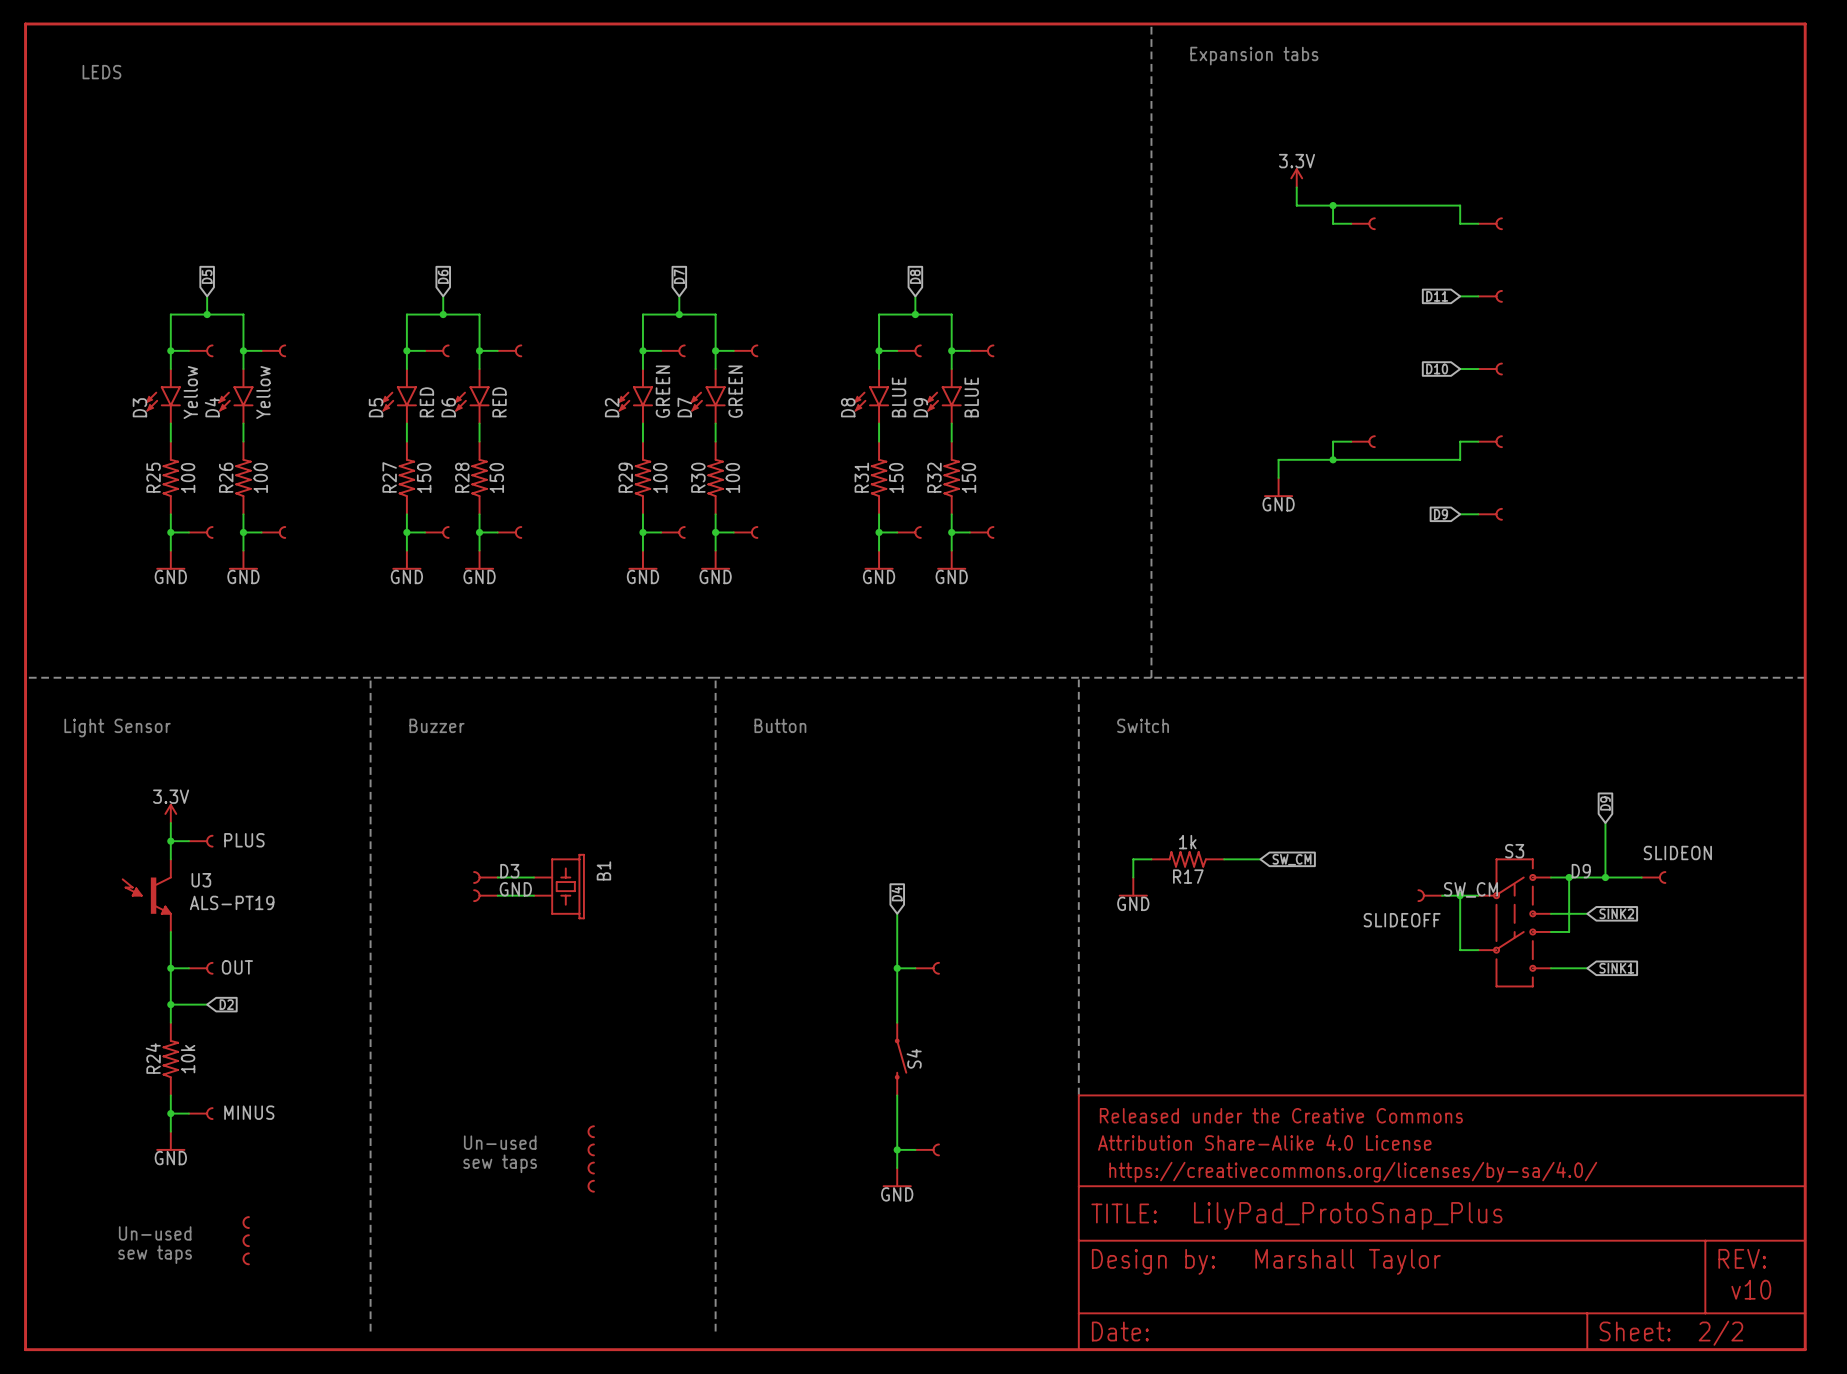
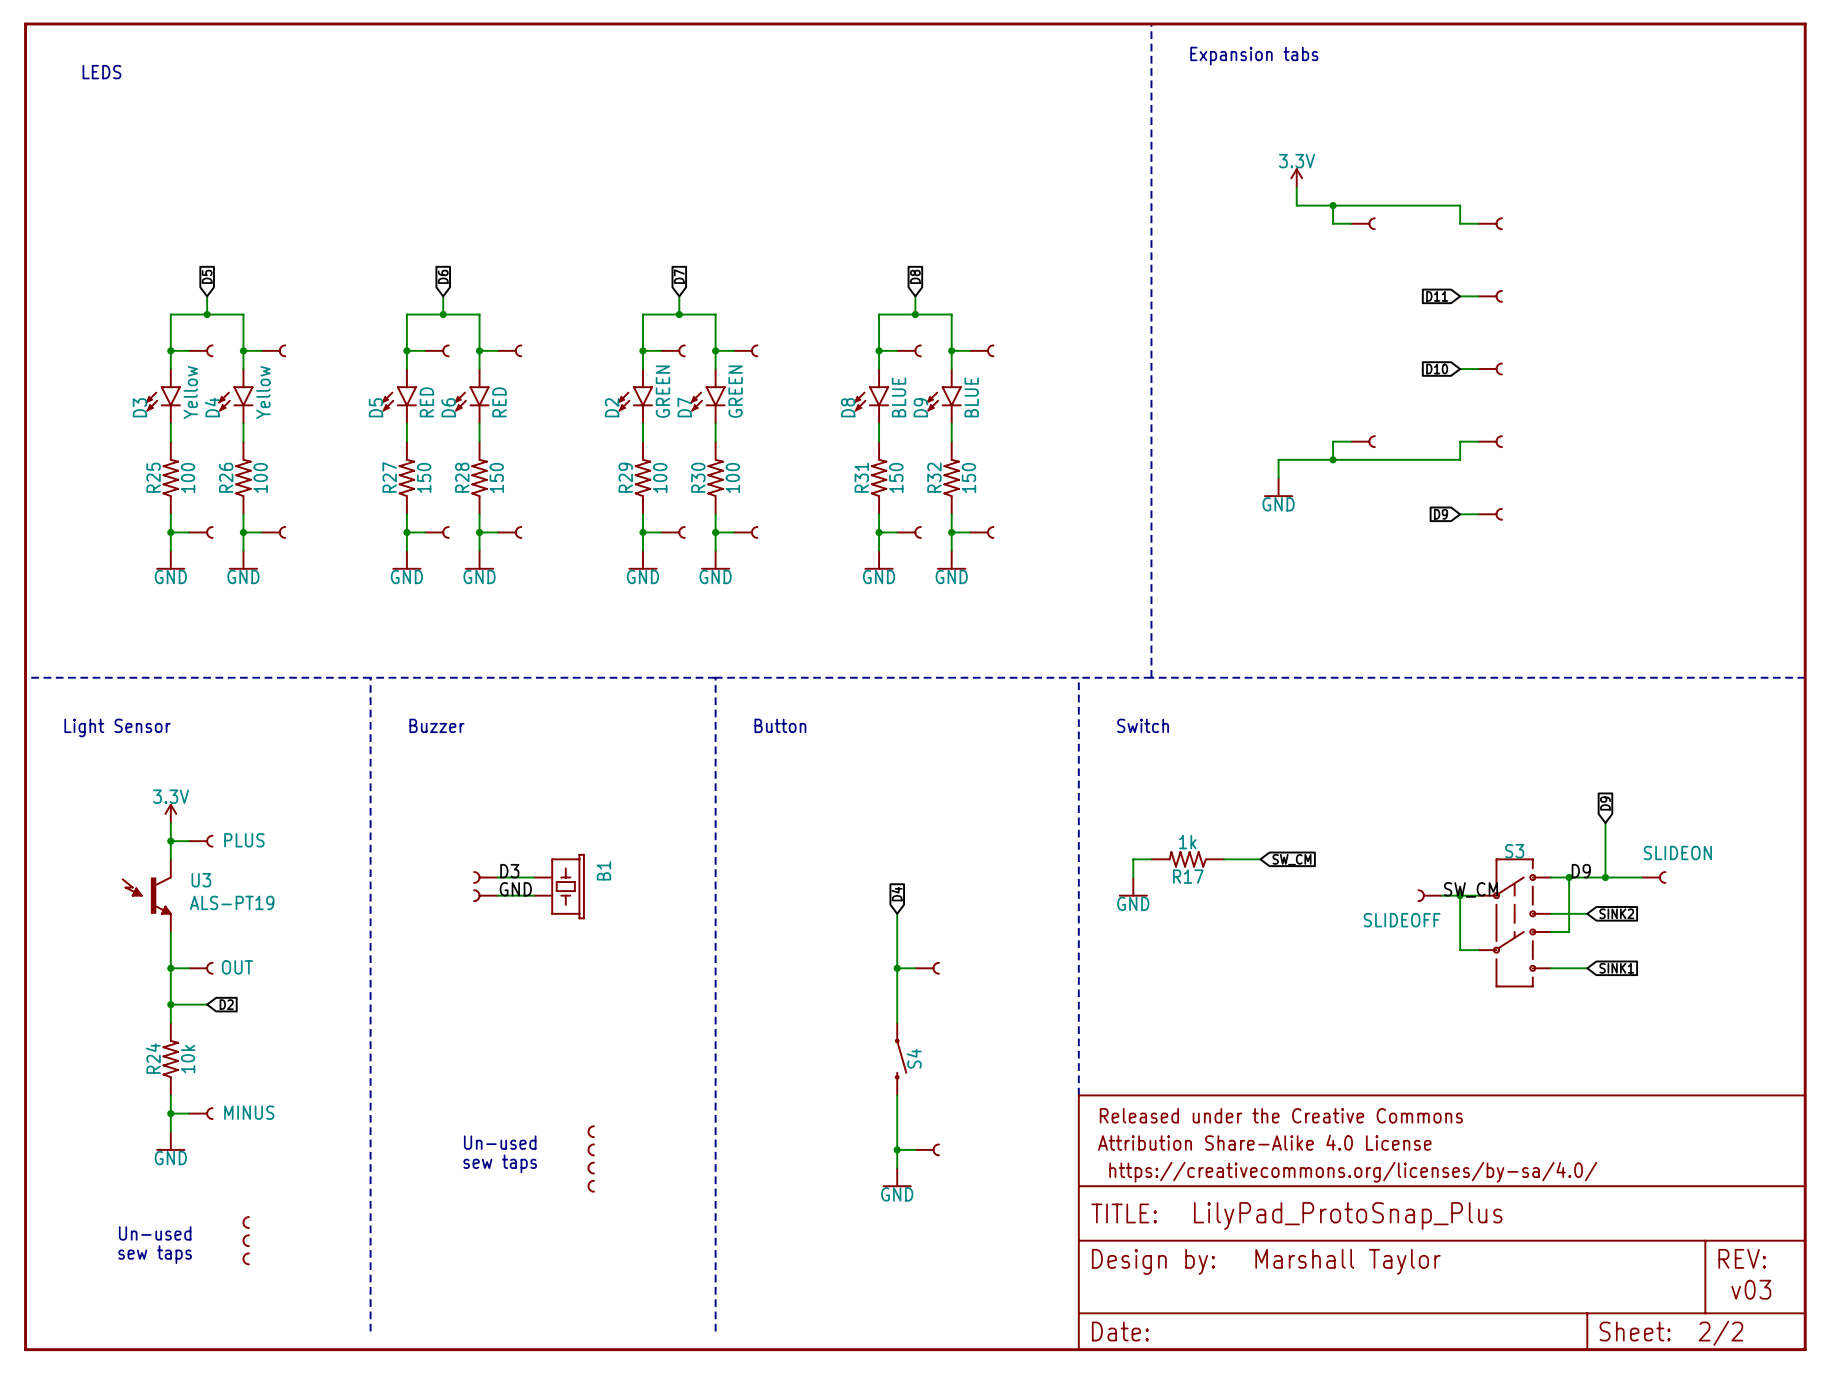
text: v10 (1751, 1289) -> v03 (1751, 1289)

